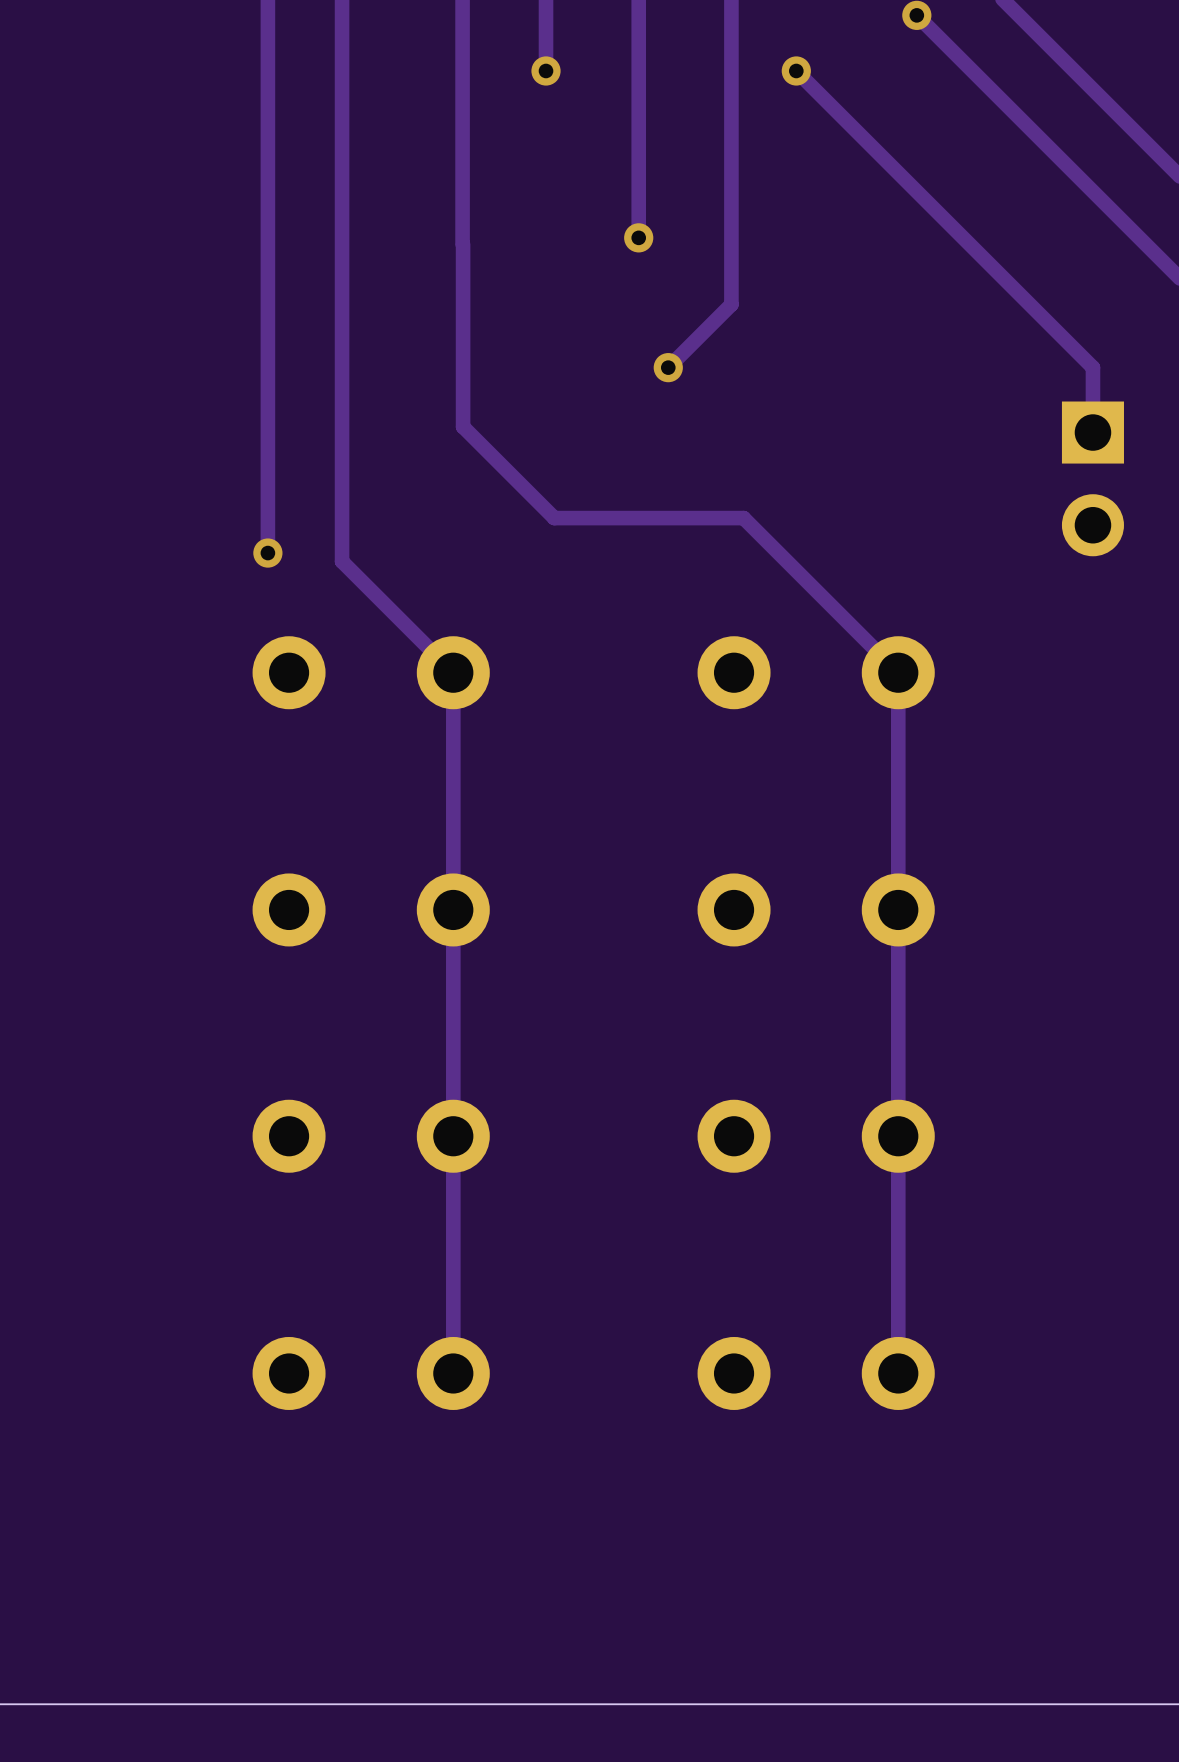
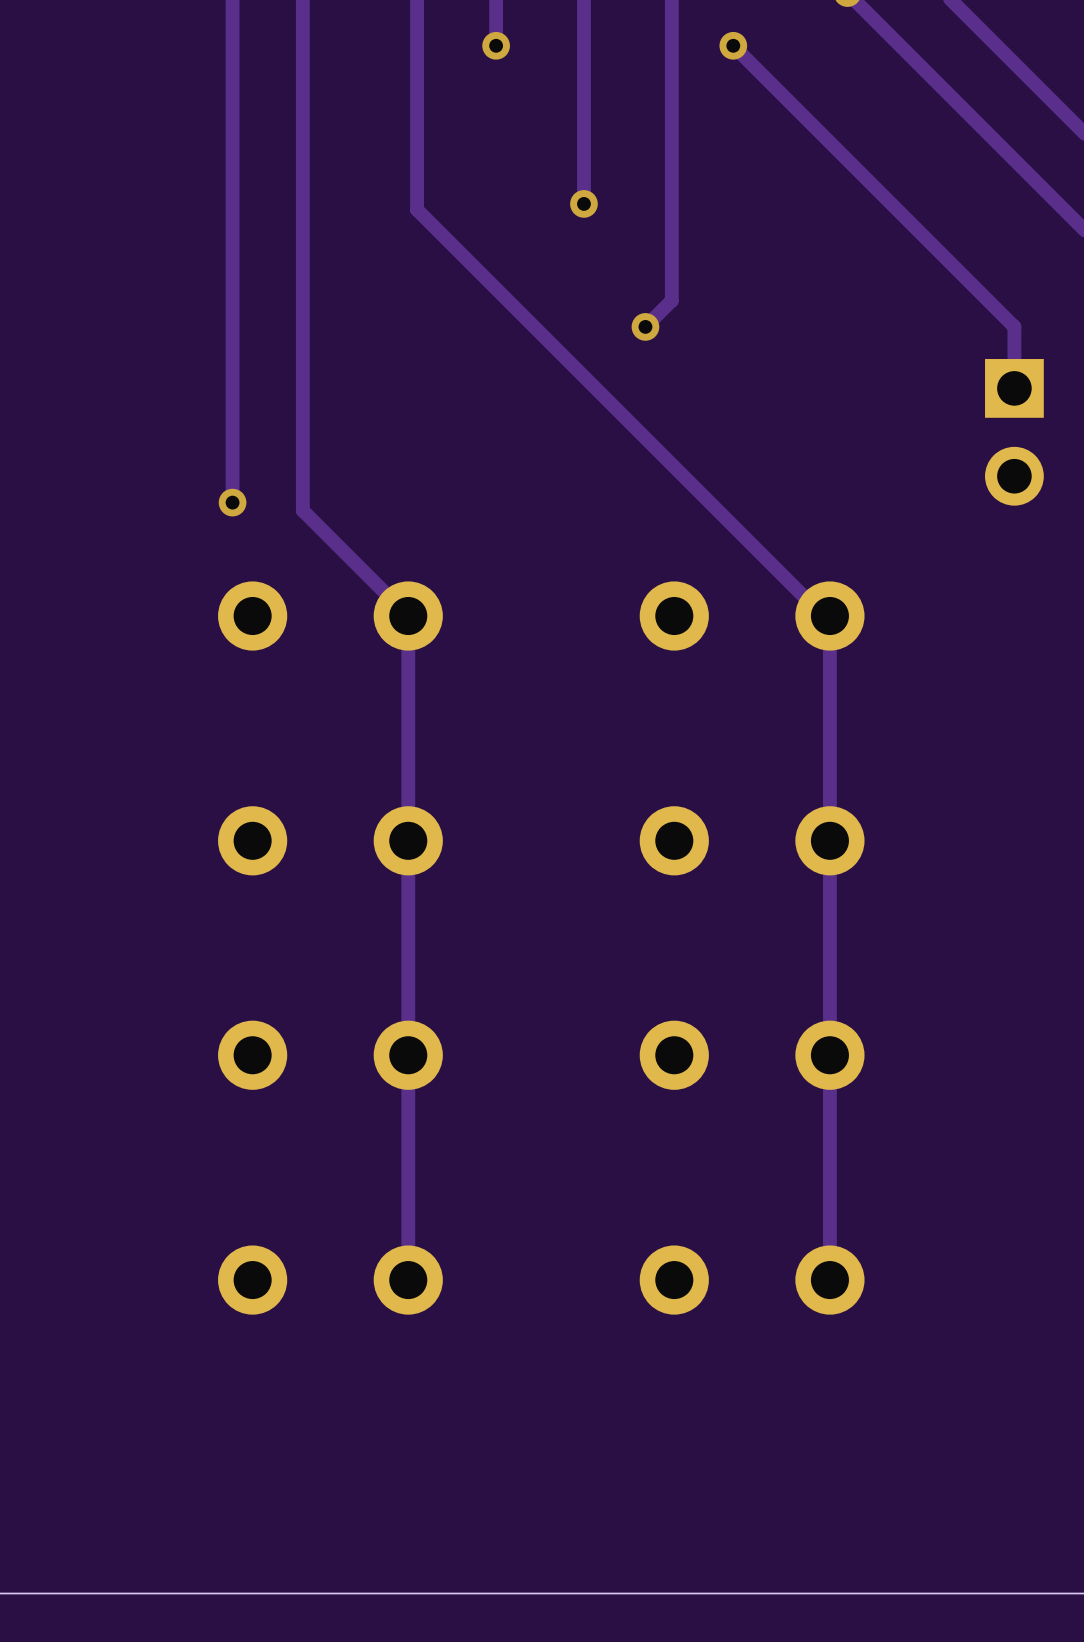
track: (463, 244) (463, 426) (554, 518) (743, 518) (898, 672) -> (417, 209) (823, 616)
track: (731, 304) (668, 367) -> (671, 267) (671, 300) (645, 326)
via position: (668, 367) -> (645, 326)

